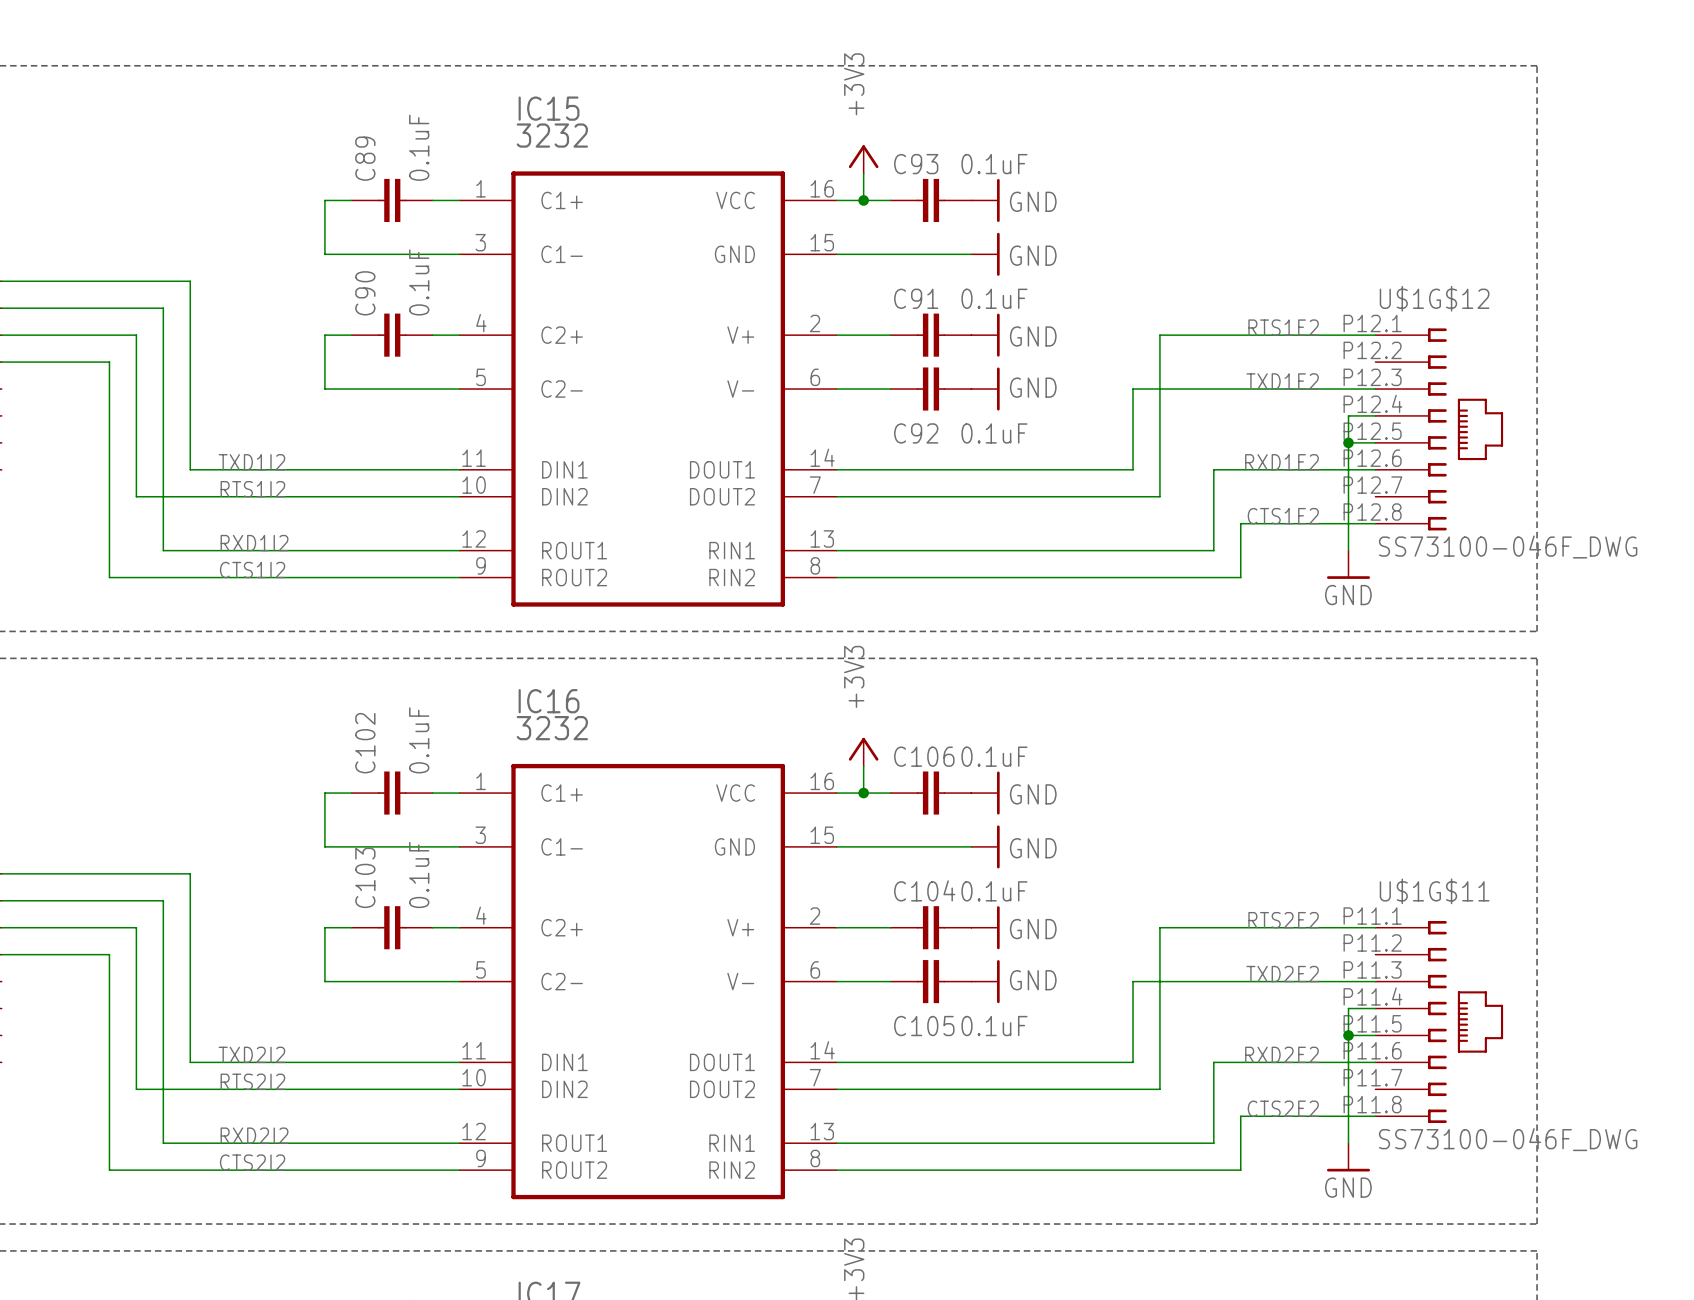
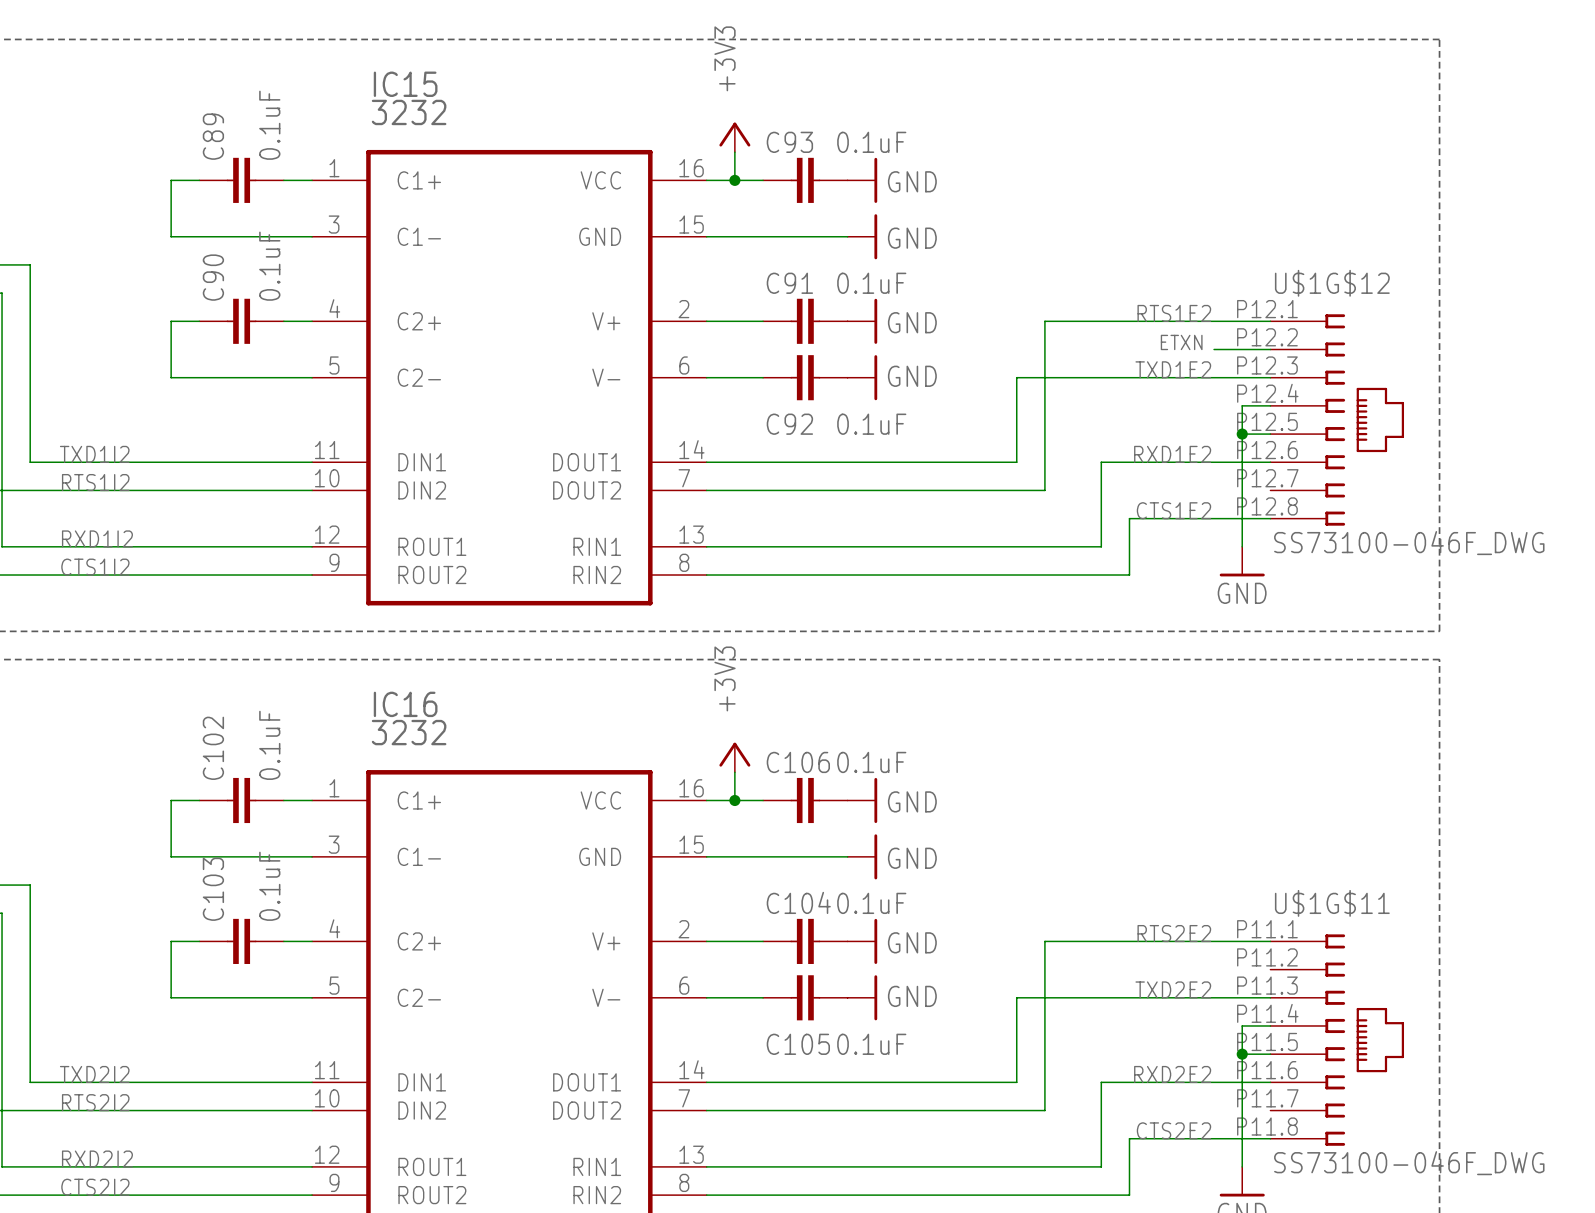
label: none -> ETXN (1181, 342)
wire: none -> (1214, 349) (1270, 349)

